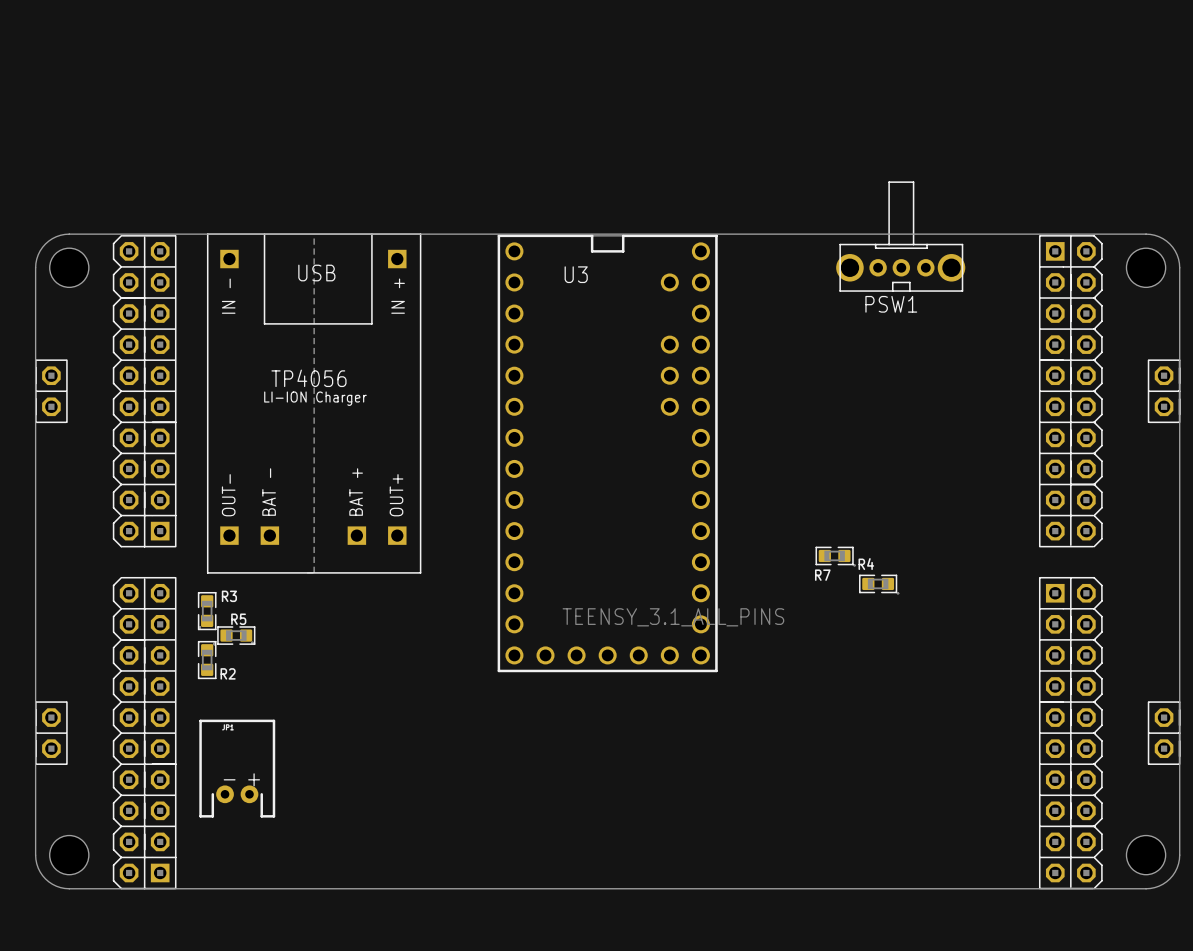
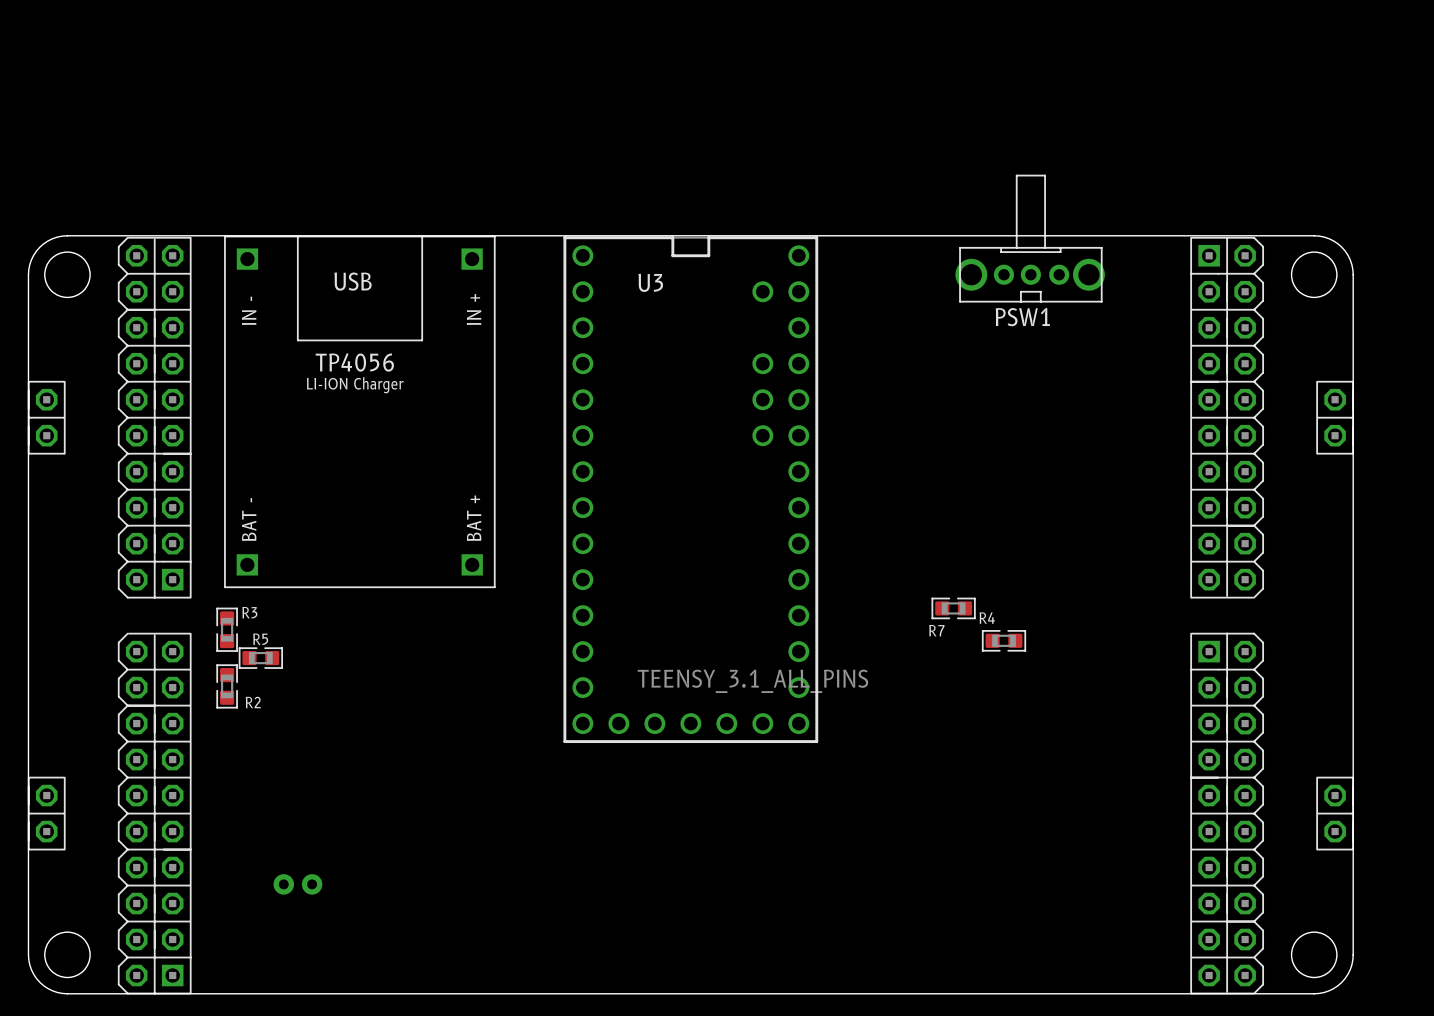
part: none -> (359, 411)
part: (314, 403) -> none
R3 position: (207, 611) -> (227, 629)
R5 position: (236, 635) -> (260, 658)
R2 position: (207, 660) -> (227, 686)
part side: top (237, 768) -> bottom (297, 884)

